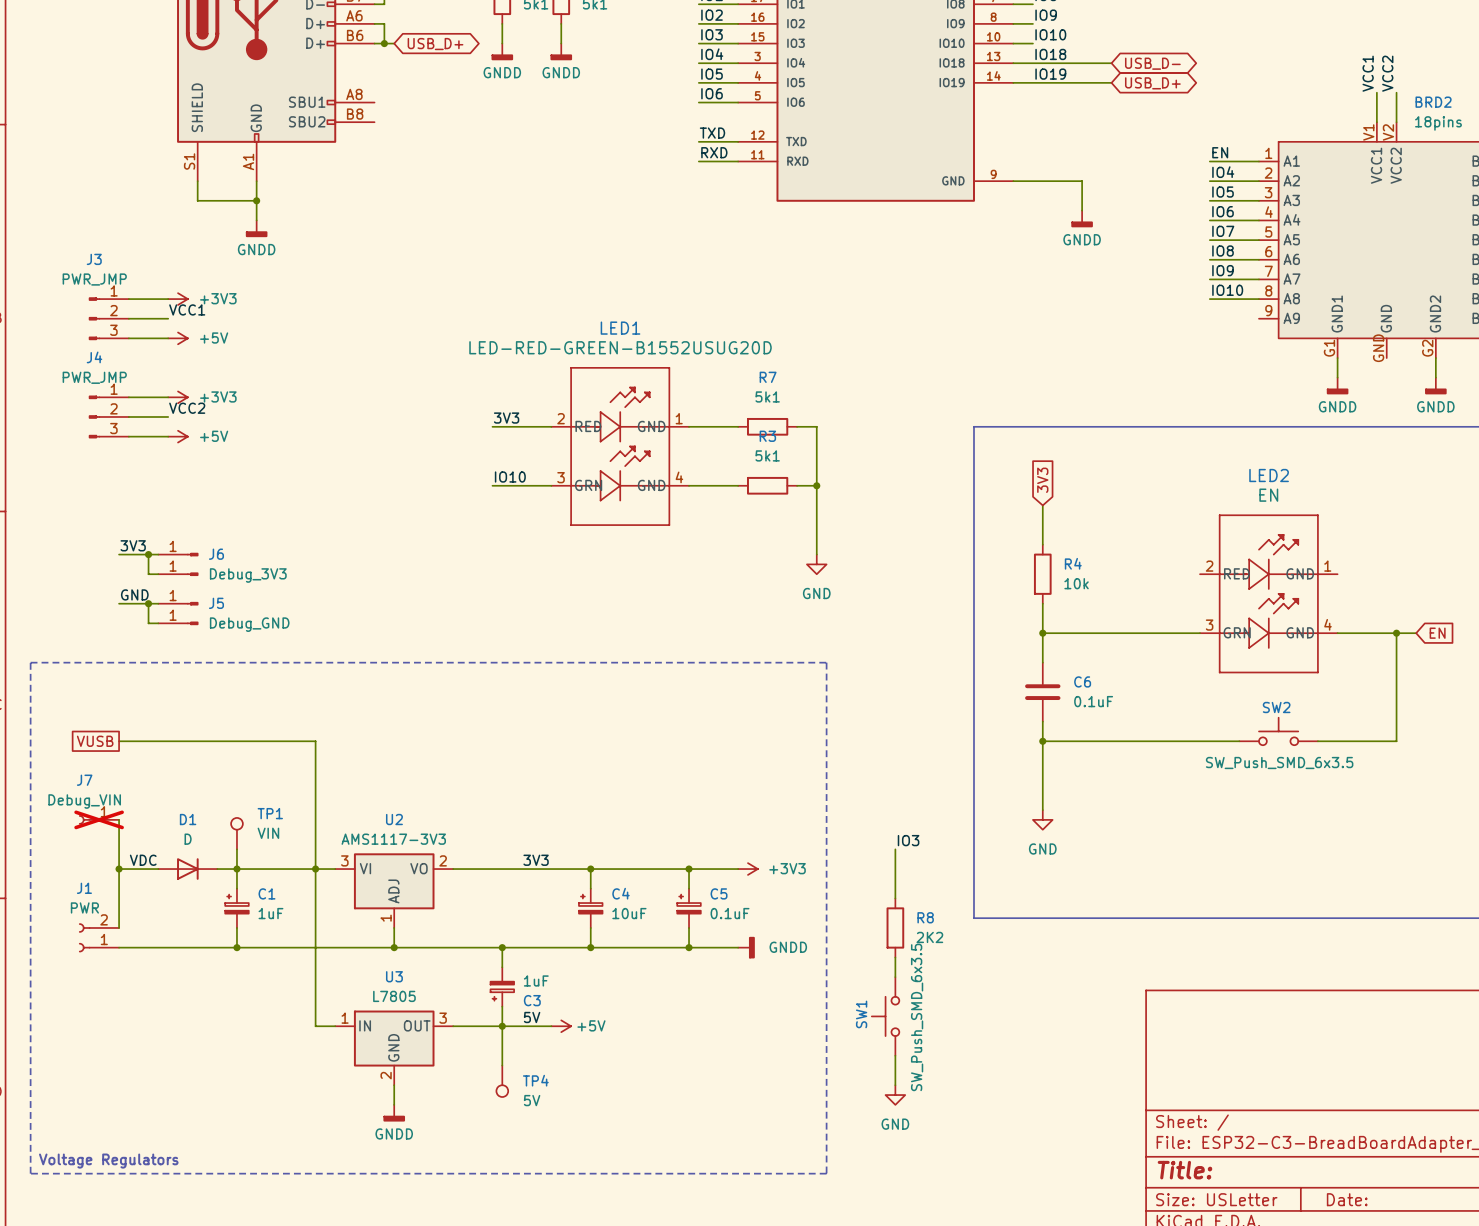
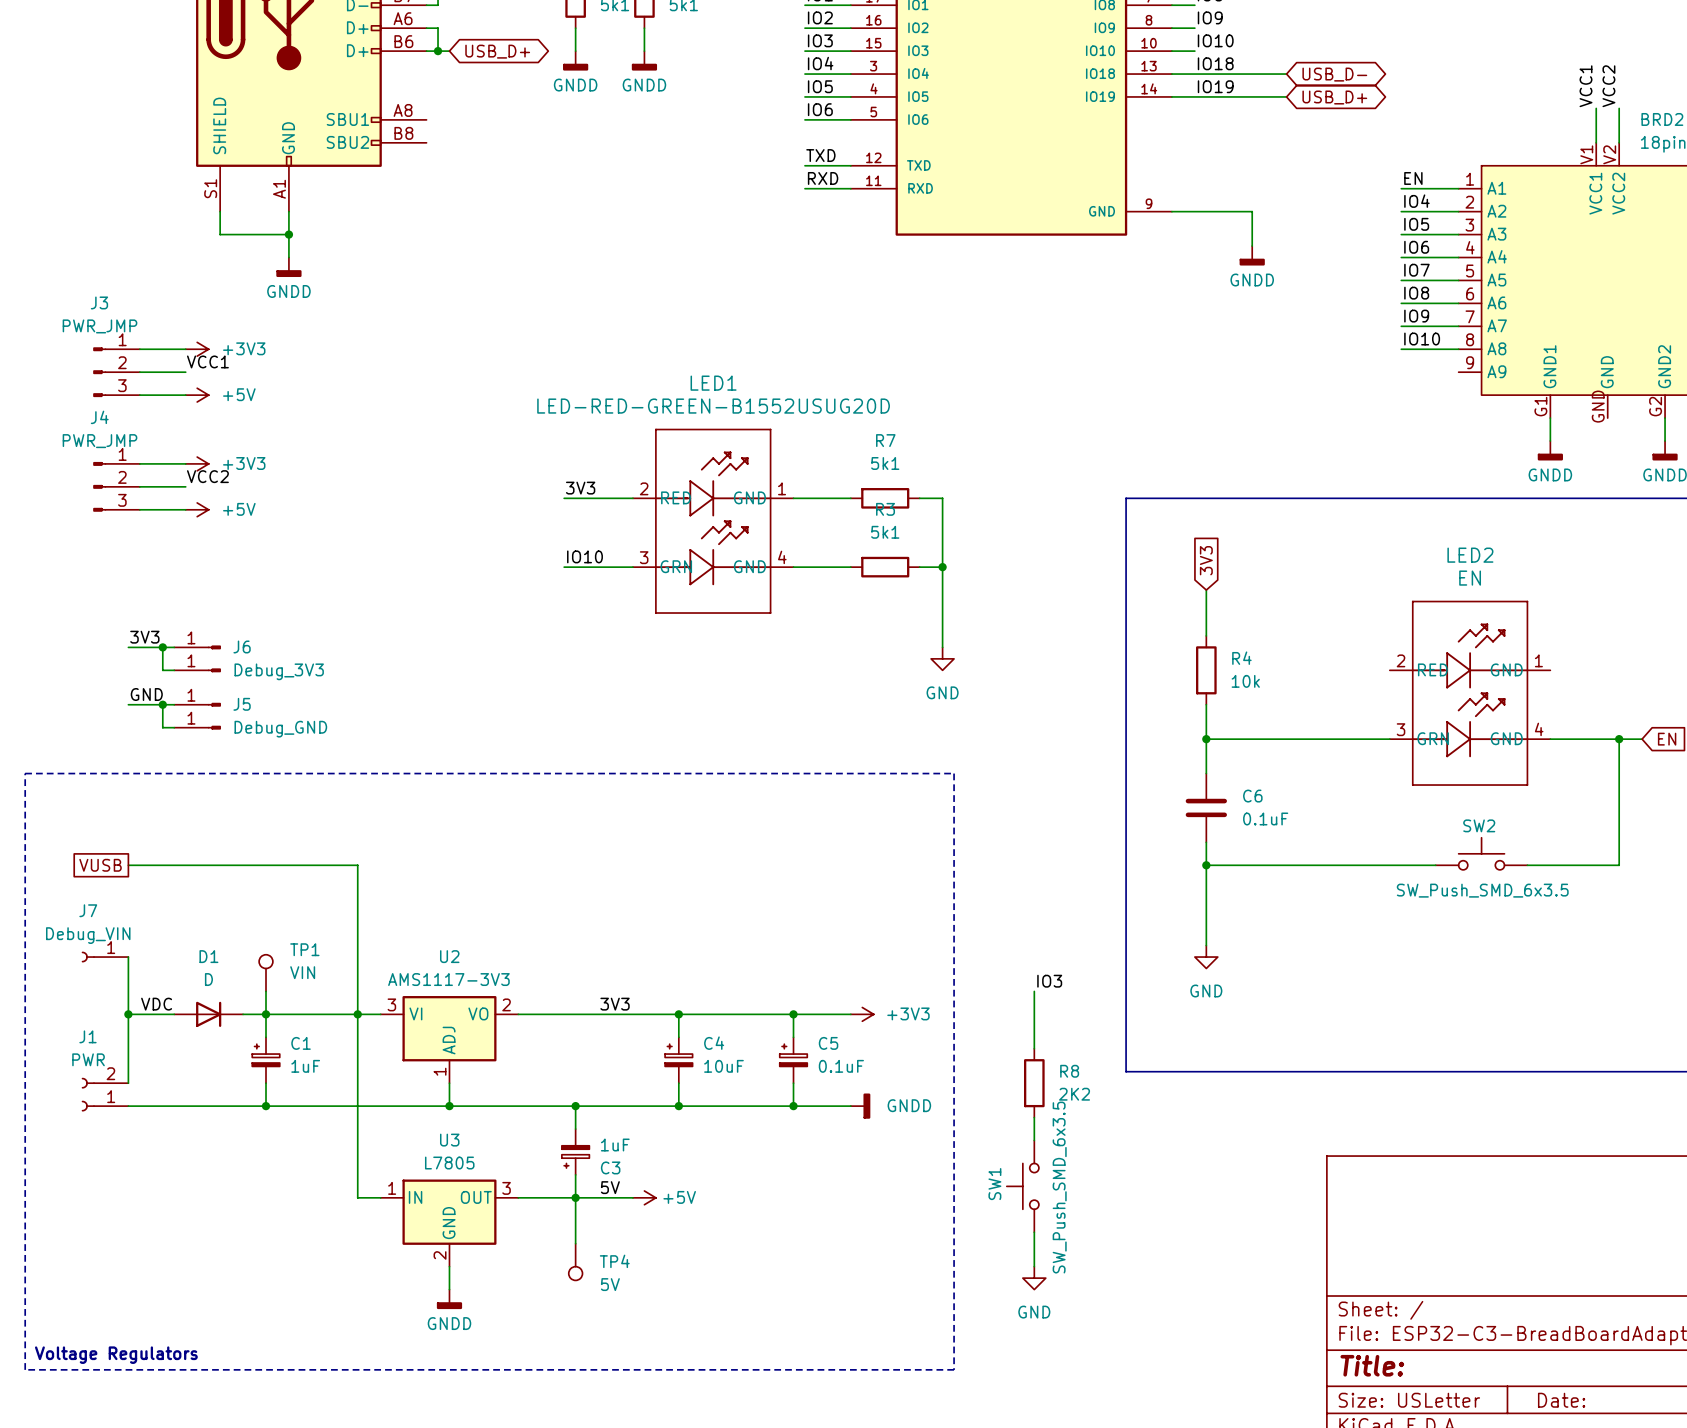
J7 do-not-place cross: (99, 819) -> none

